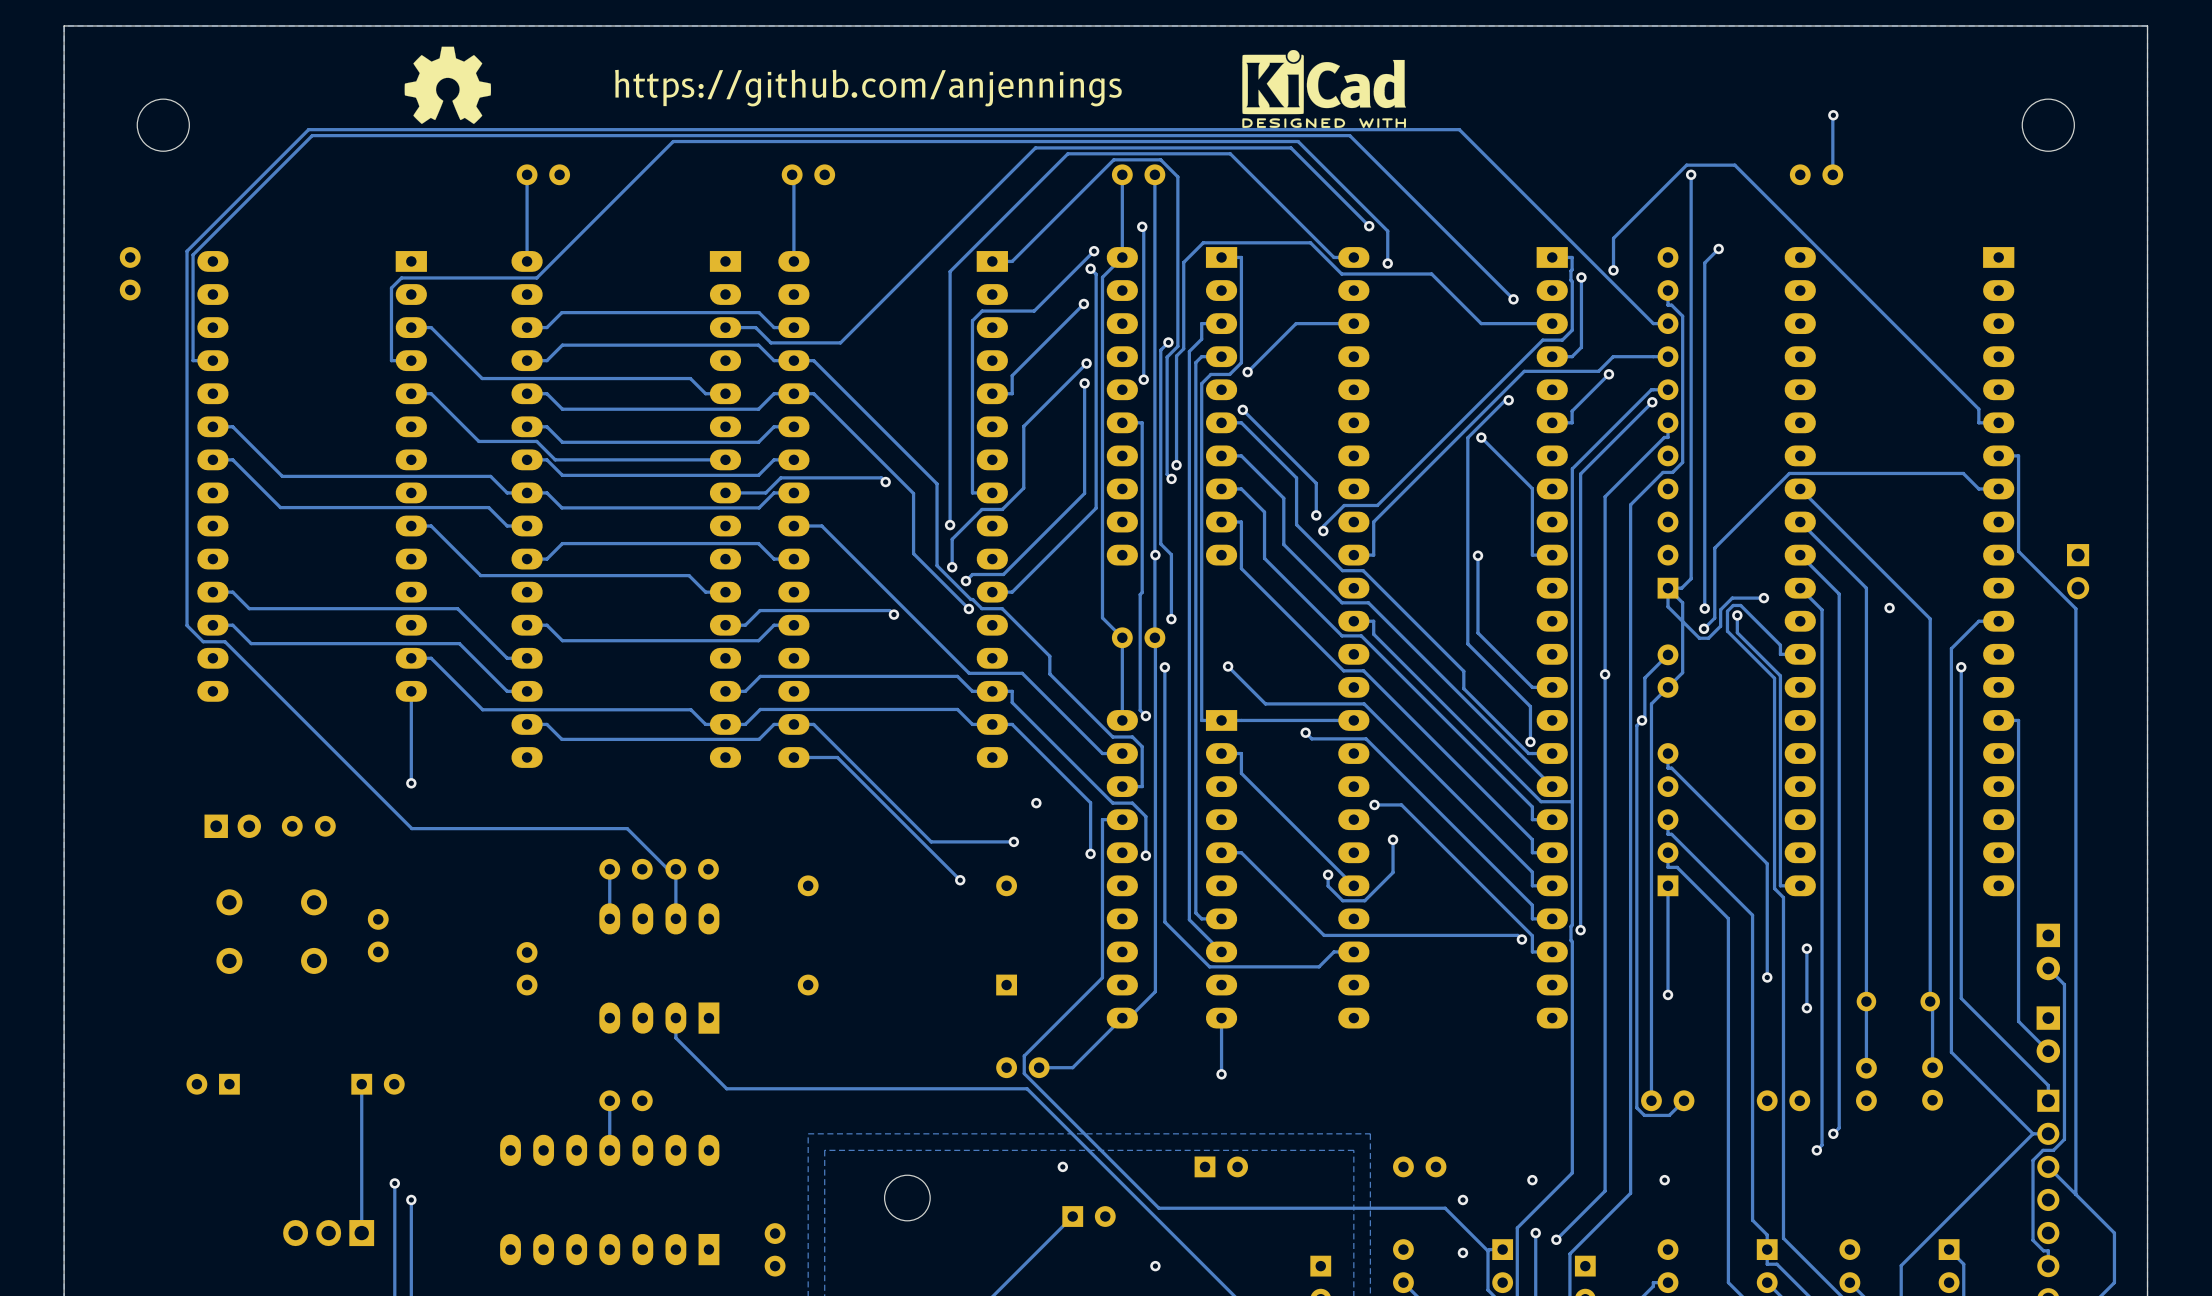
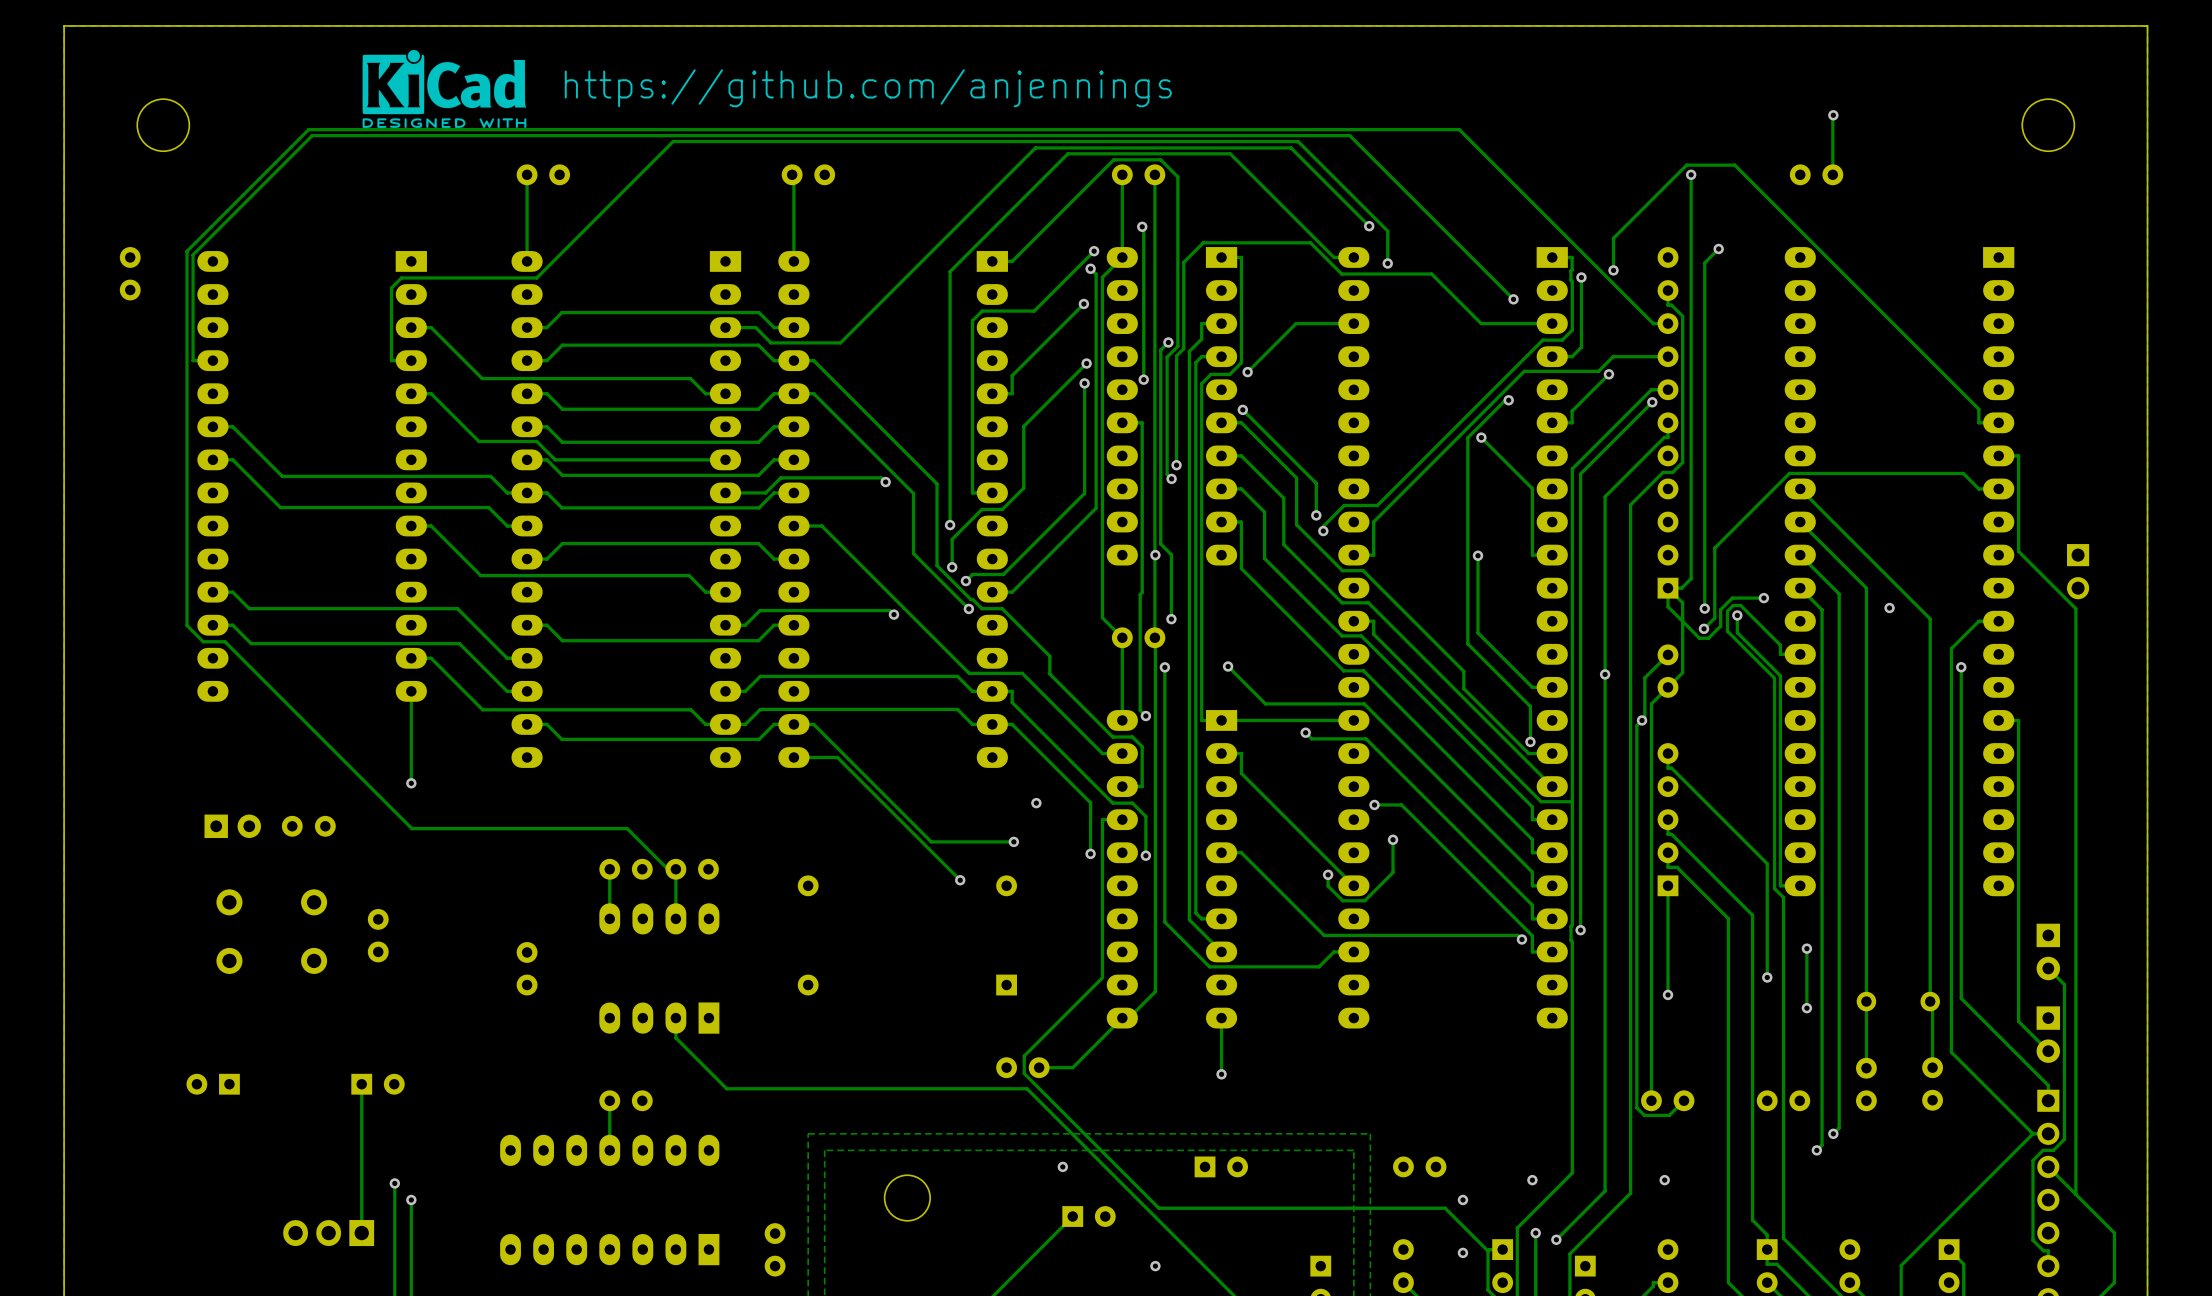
drawing shape: [404, 46, 492, 124] -> [362, 49, 527, 128]
drawing: [1242, 49, 1407, 128] -> none

